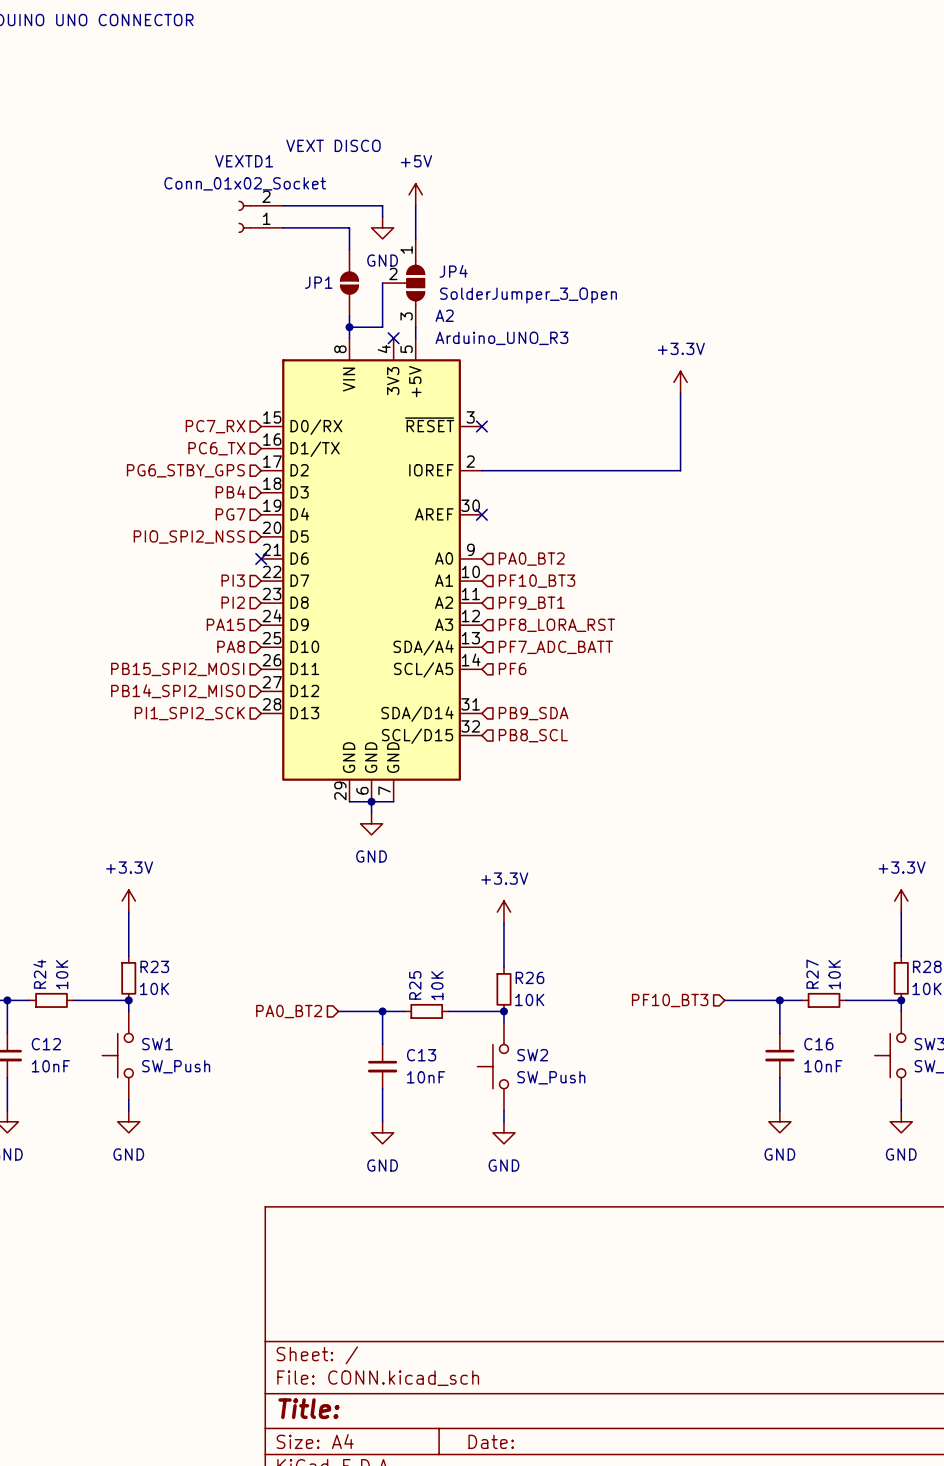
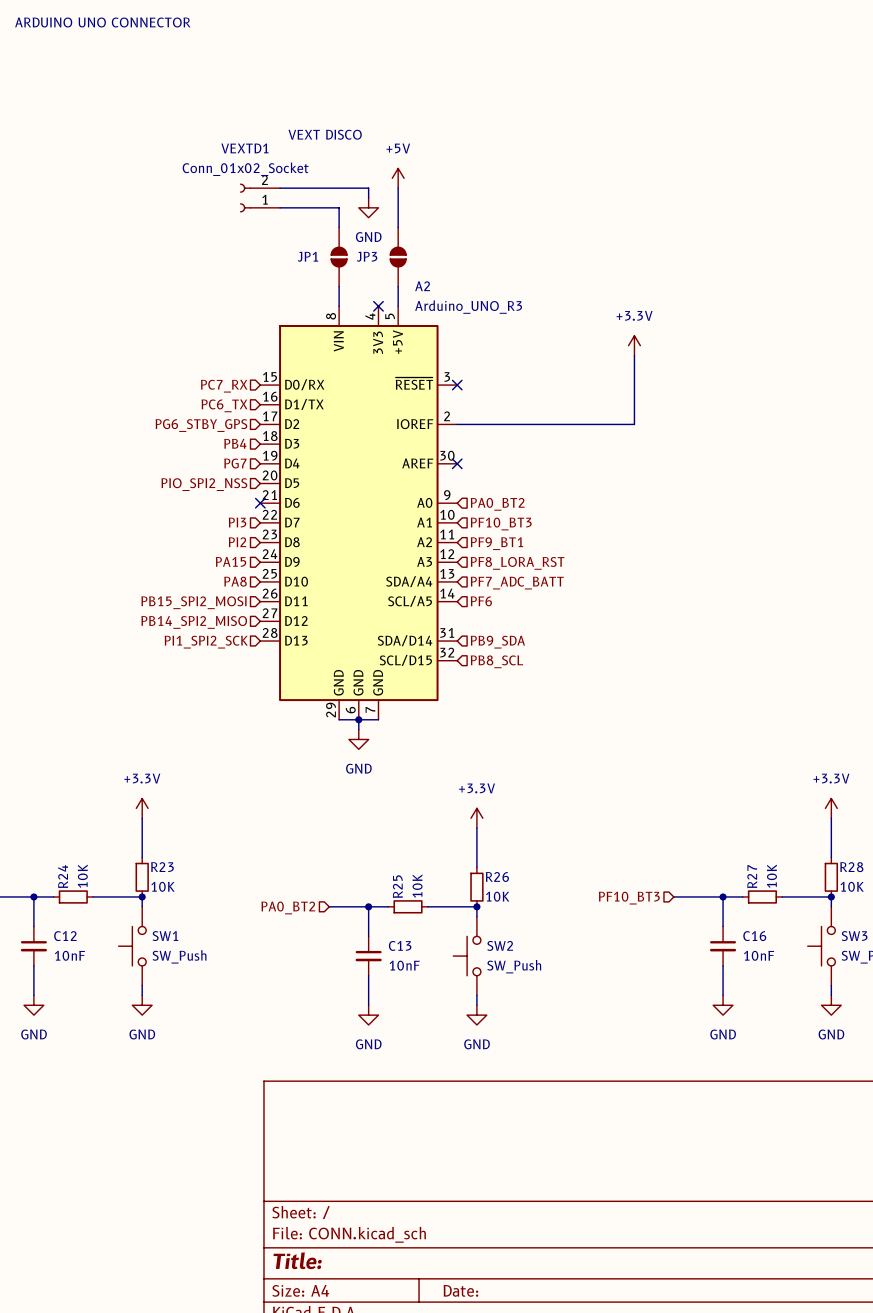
wire: (382, 283) (382, 327) (349, 327) -> none
JP4: SolderJumper_3_Open (403, 283) -> none
JP3: none -> (398, 257)
junction: (349, 327) -> none

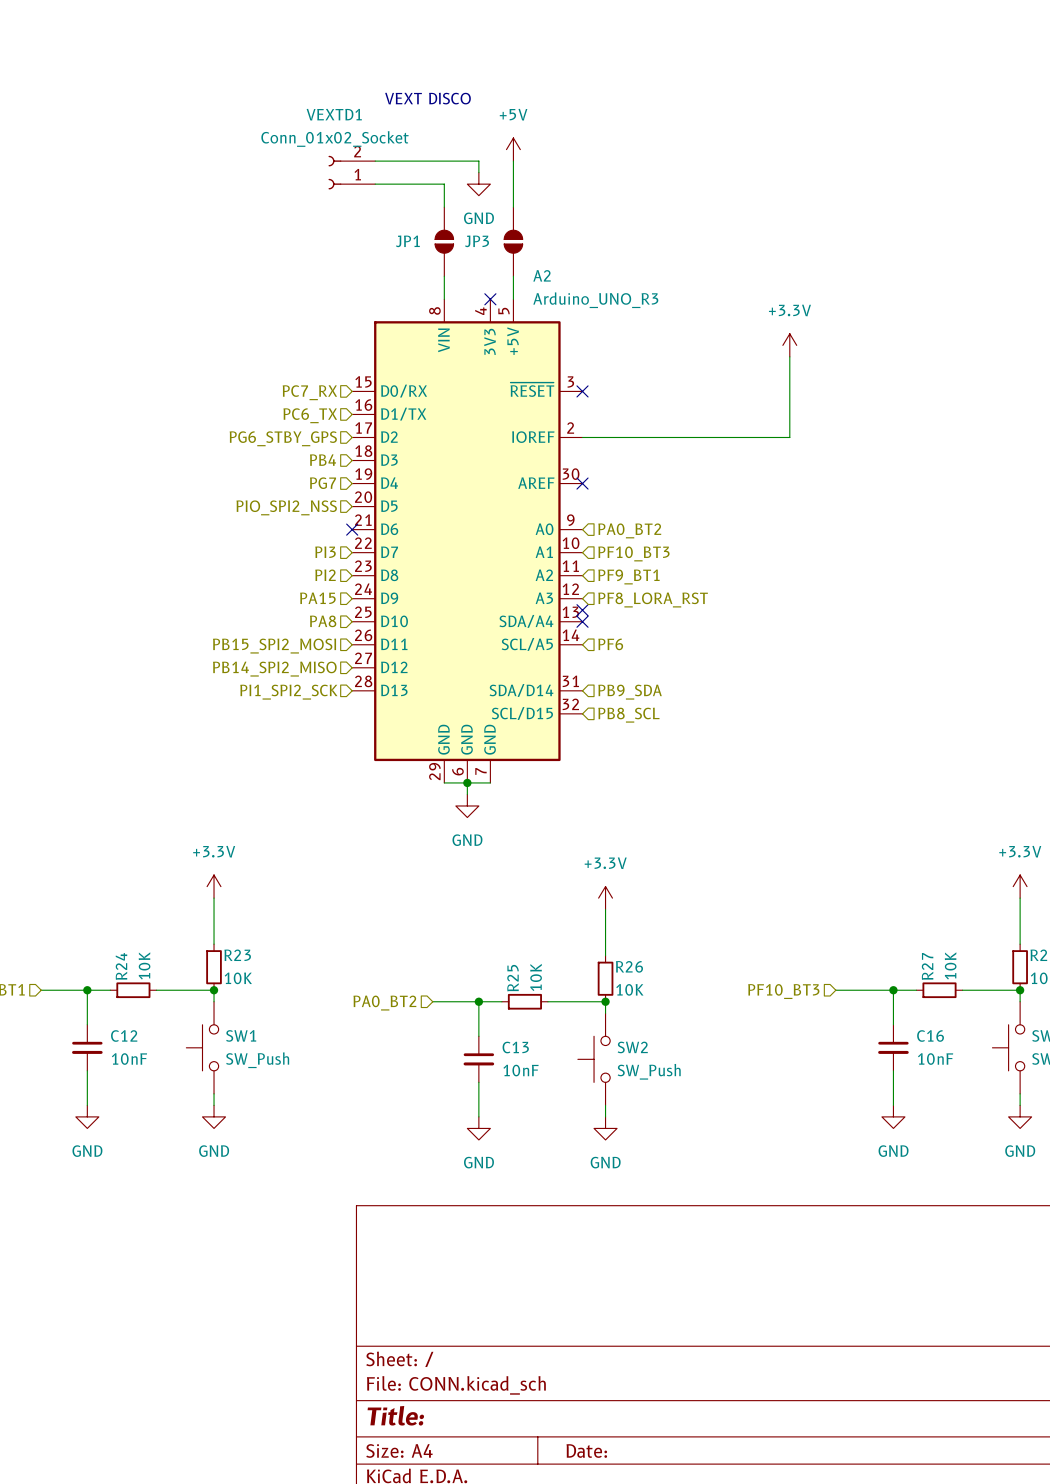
no-connect mark: none -> (582, 610)
no-connect mark: none -> (582, 621)
hierarchical label: PF7_ADC_BATT (517, 583) -> none

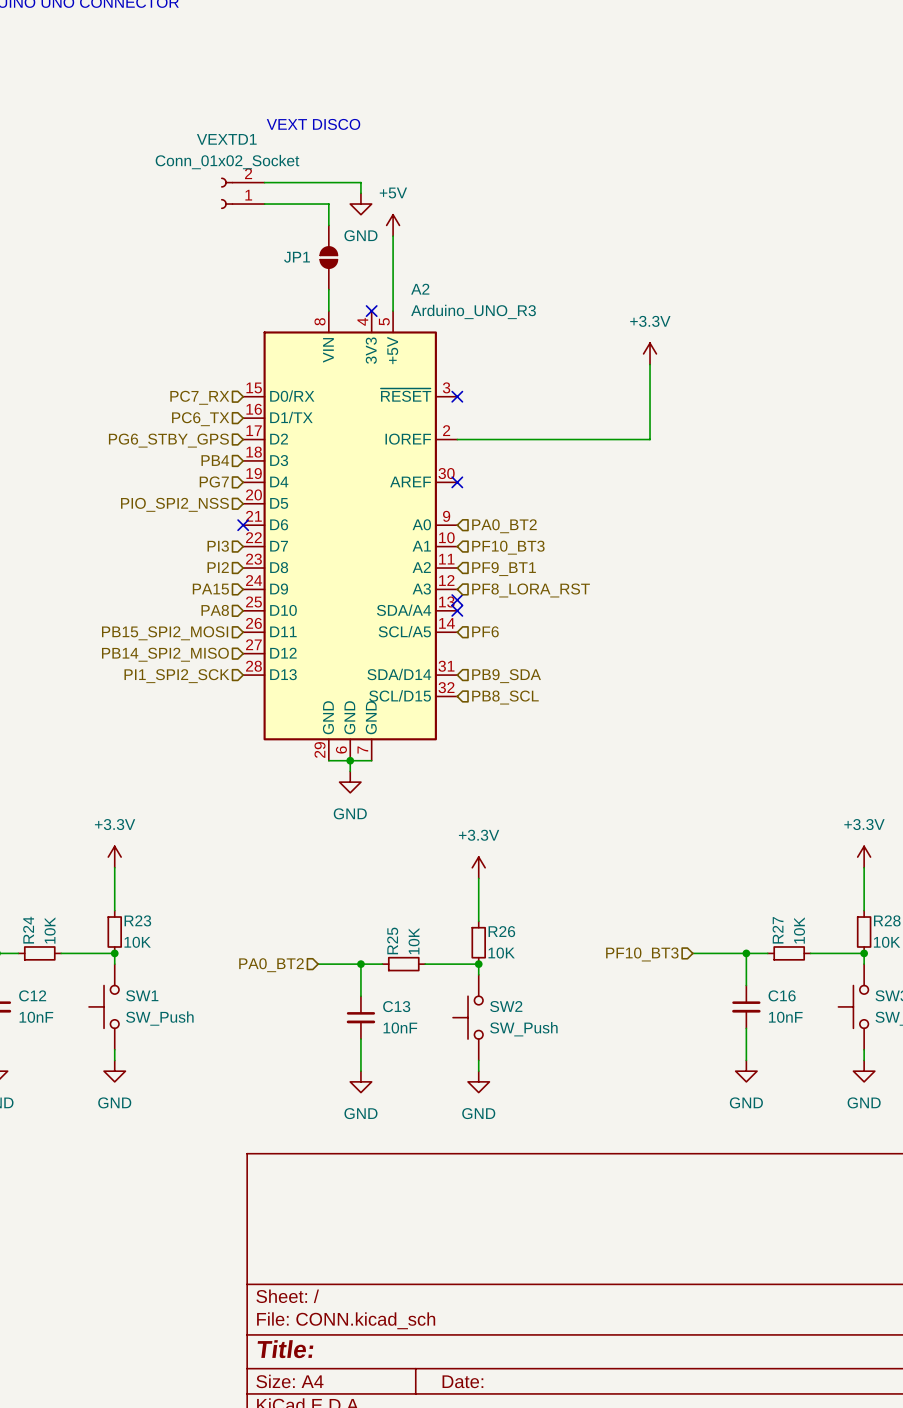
power symbol position: +5V (513, 149) -> +5V (393, 225)
wire: (513, 161) (513, 207) -> none
JP3: (513, 241) -> none

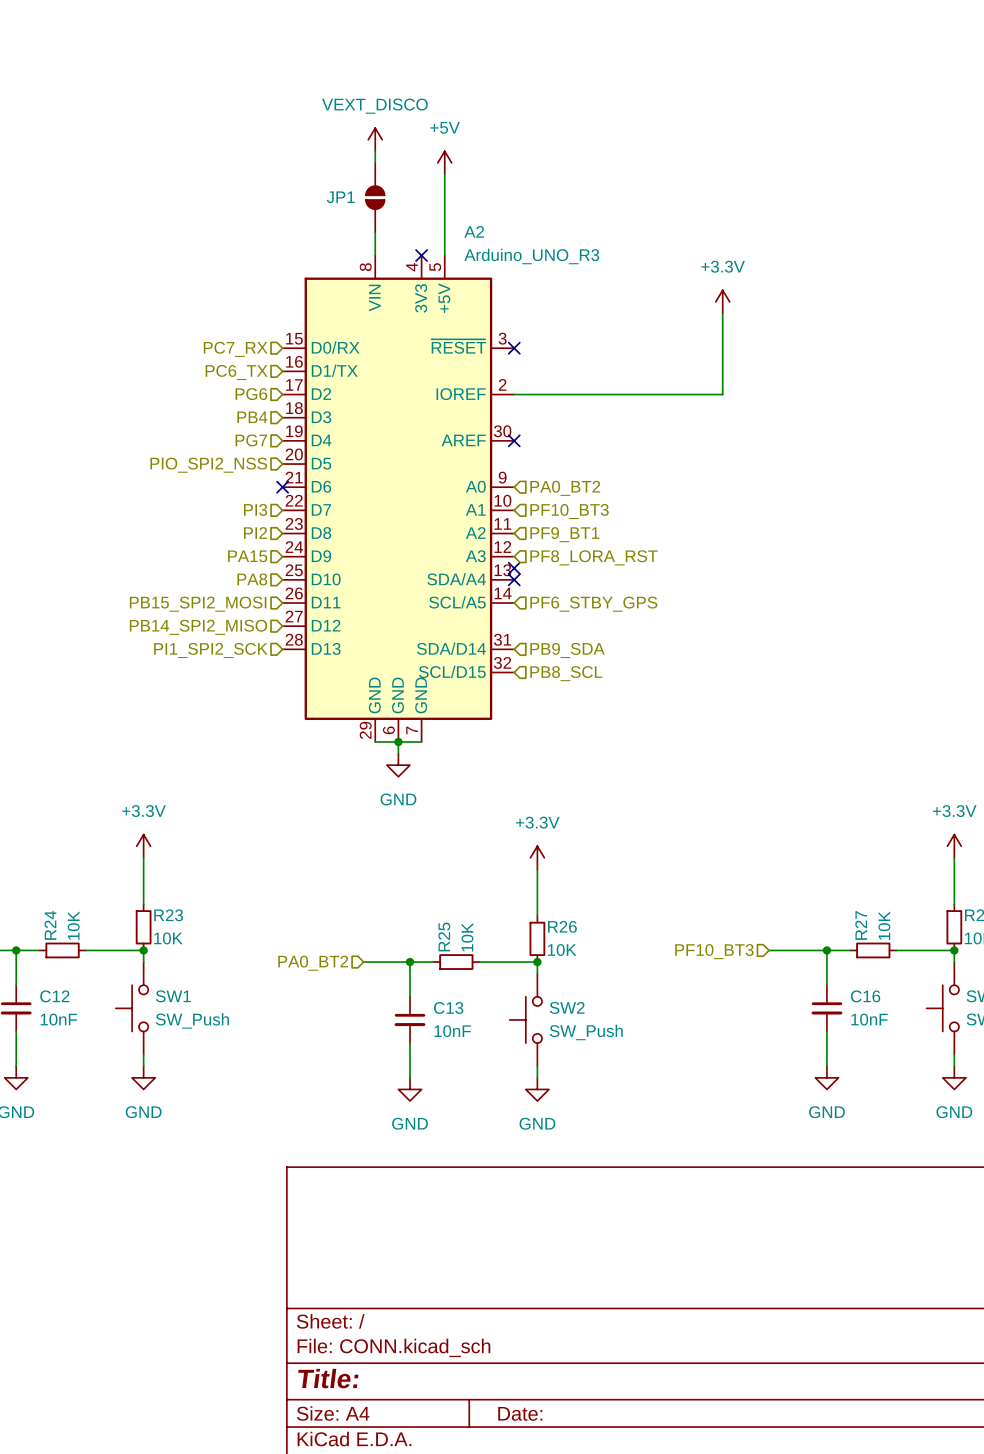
text: VEXT DISCO (313, 124) -> none
wire: (264, 182) (360, 182) (360, 193) -> none
VEXTD1: Conn_01x02_Socket (242, 193) -> none
wire: (264, 204) (328, 204) (328, 214) -> none
power symbol: none -> VEXT_DISCO (375, 139)
power symbol: GND (360, 204) -> none
hierarchical label: PG6_STBY_GPS (168, 440) -> PG6 (251, 394)
hierarchical label: PF6 (485, 631) -> PF6_STBY_GPS (593, 604)

